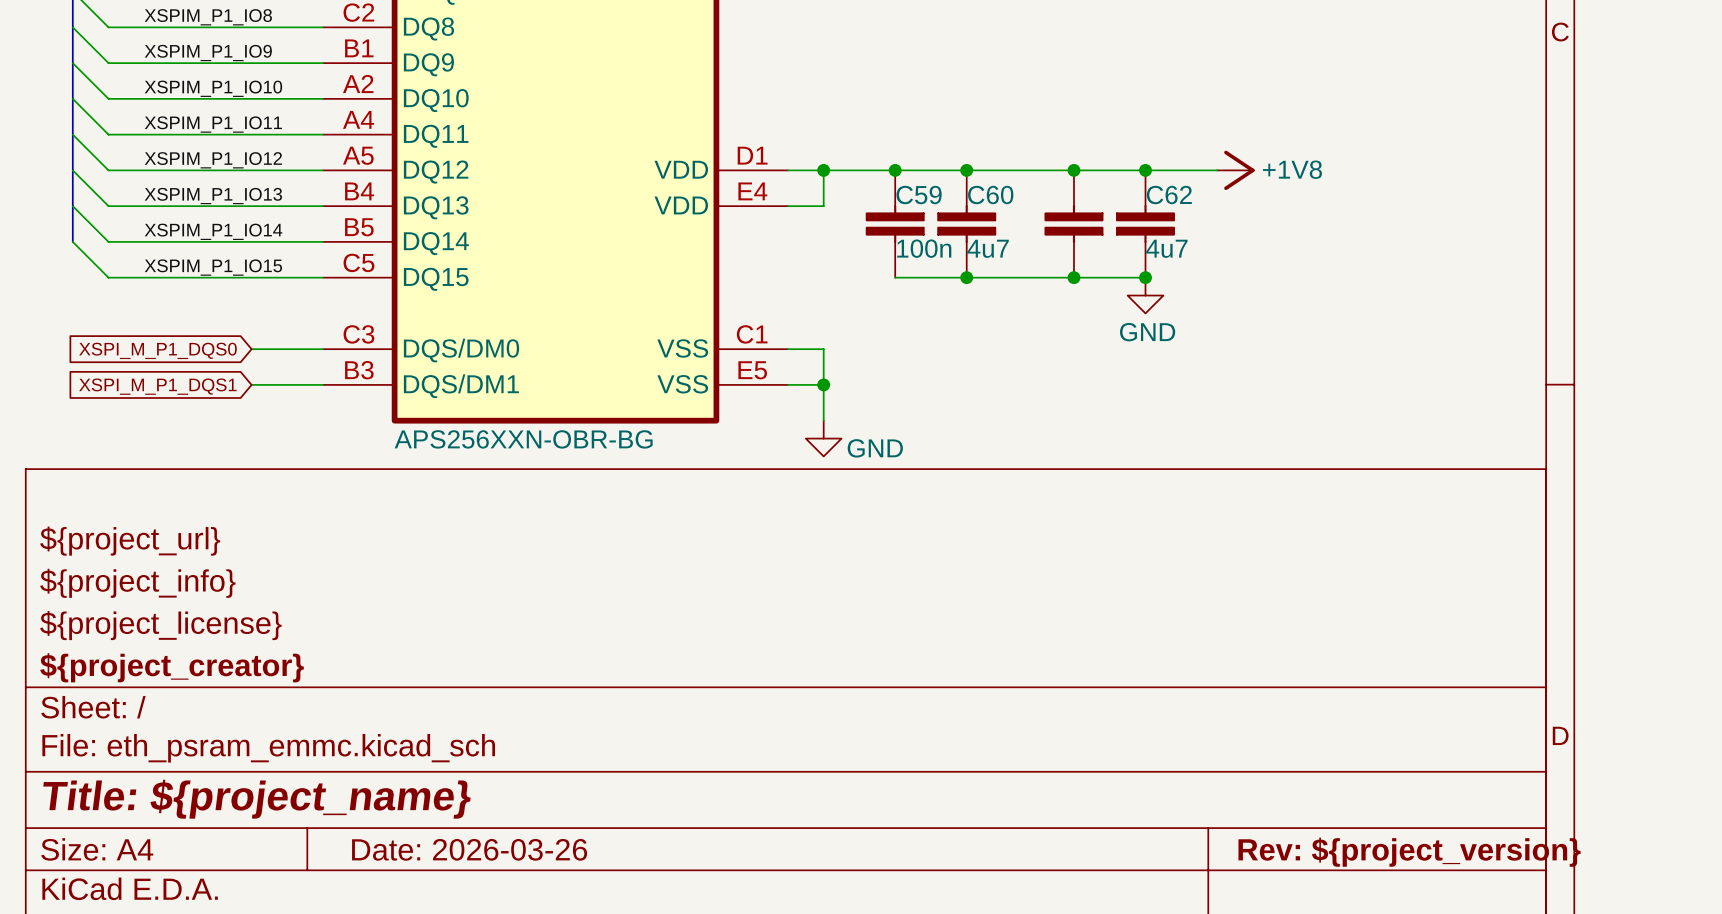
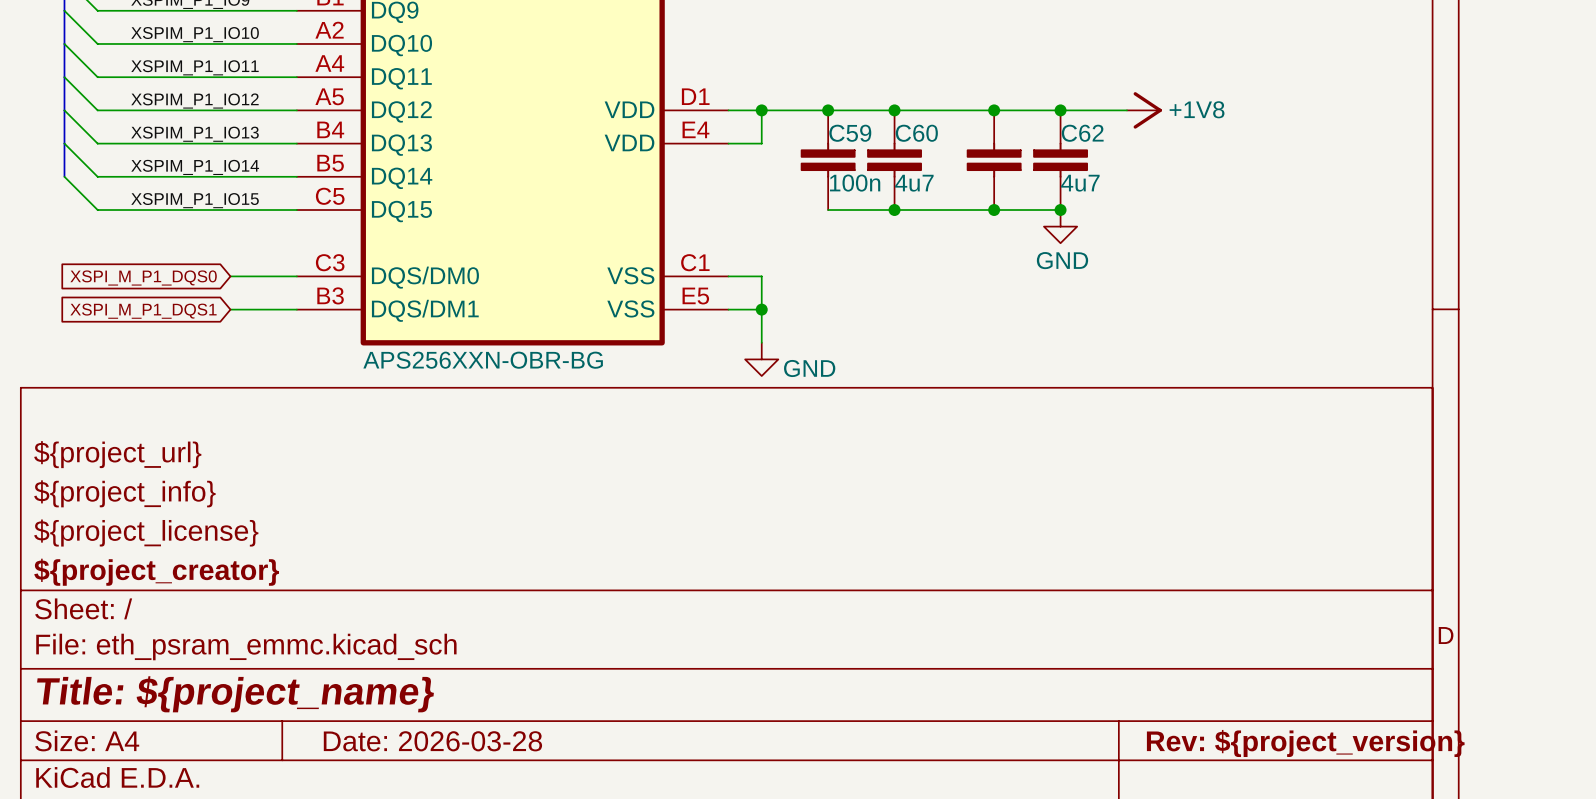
title block: Date: 2026-03-26 (469, 849) -> Date: 2026-03-28 (432, 741)

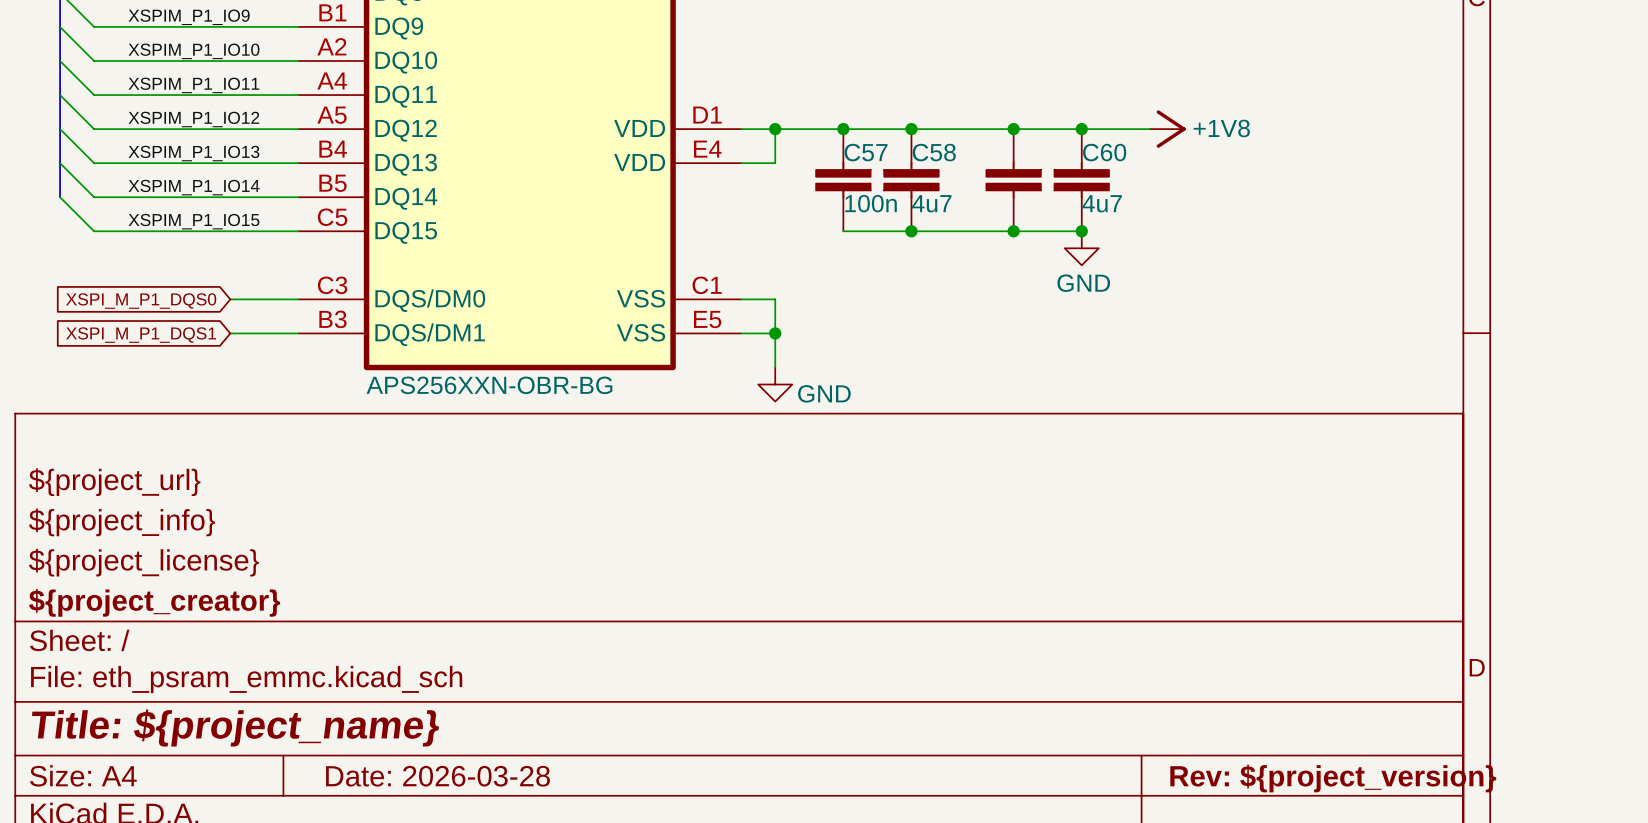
C59 name: C59 (850, 133) -> C57 (866, 152)
C60 name: C60 (916, 133) -> C58 (934, 152)
C62 name: C62 (1082, 133) -> C60 (1104, 152)

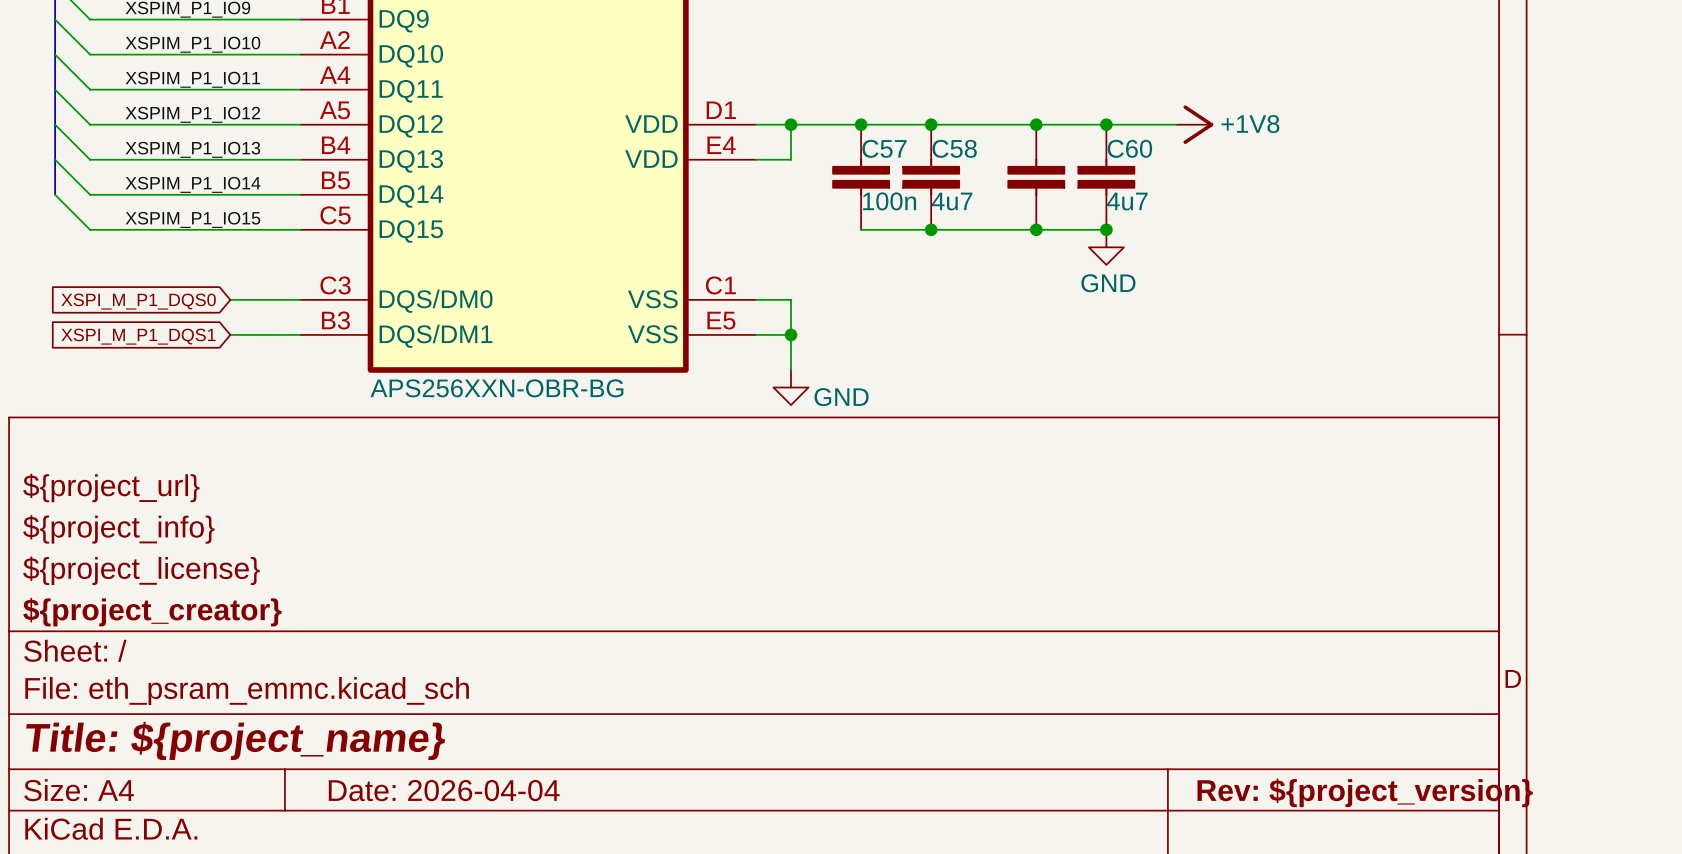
title block: Date: 2026-03-28 (437, 776) -> Date: 2026-04-04 (444, 790)

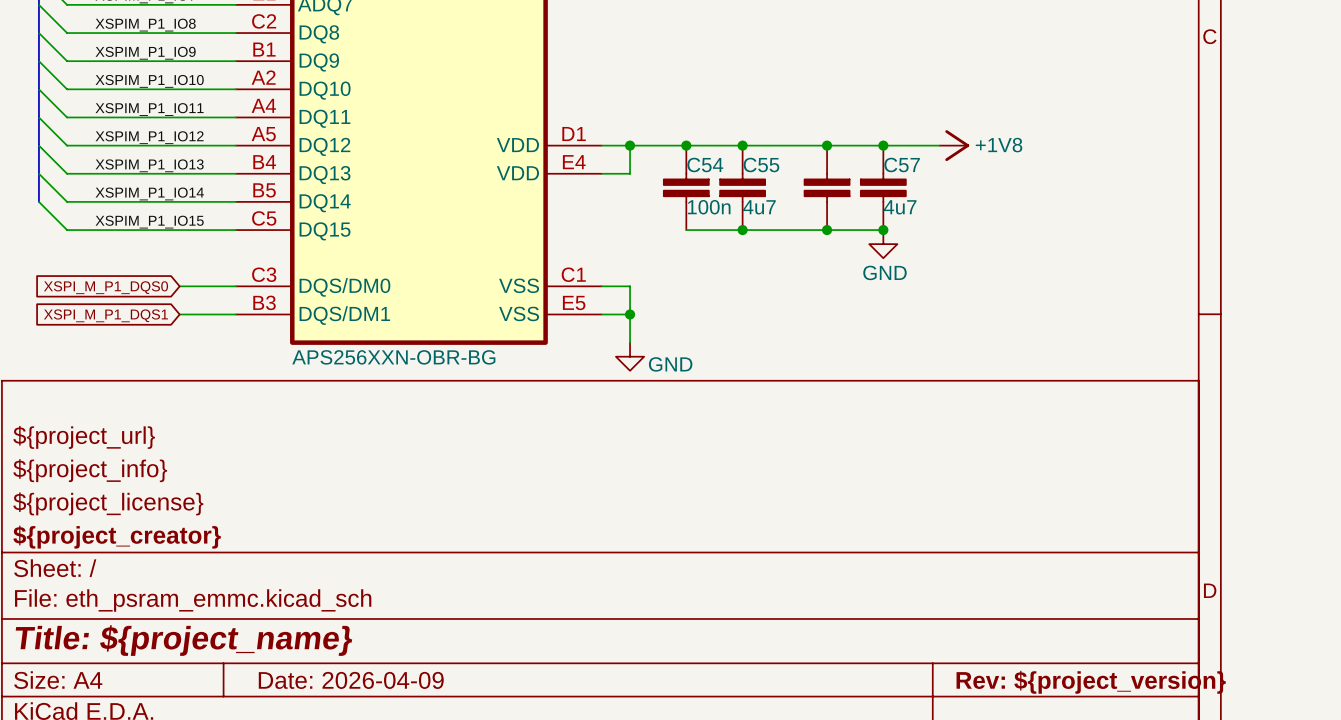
C57 name: C57 (884, 148) -> C54 (705, 164)
C58 name: C58 (954, 148) -> C55 (761, 164)
C60 name: C60 (1129, 148) -> C57 (902, 164)
title block: Date: 2026-04-04 (444, 790) -> Date: 2026-04-09 (351, 680)

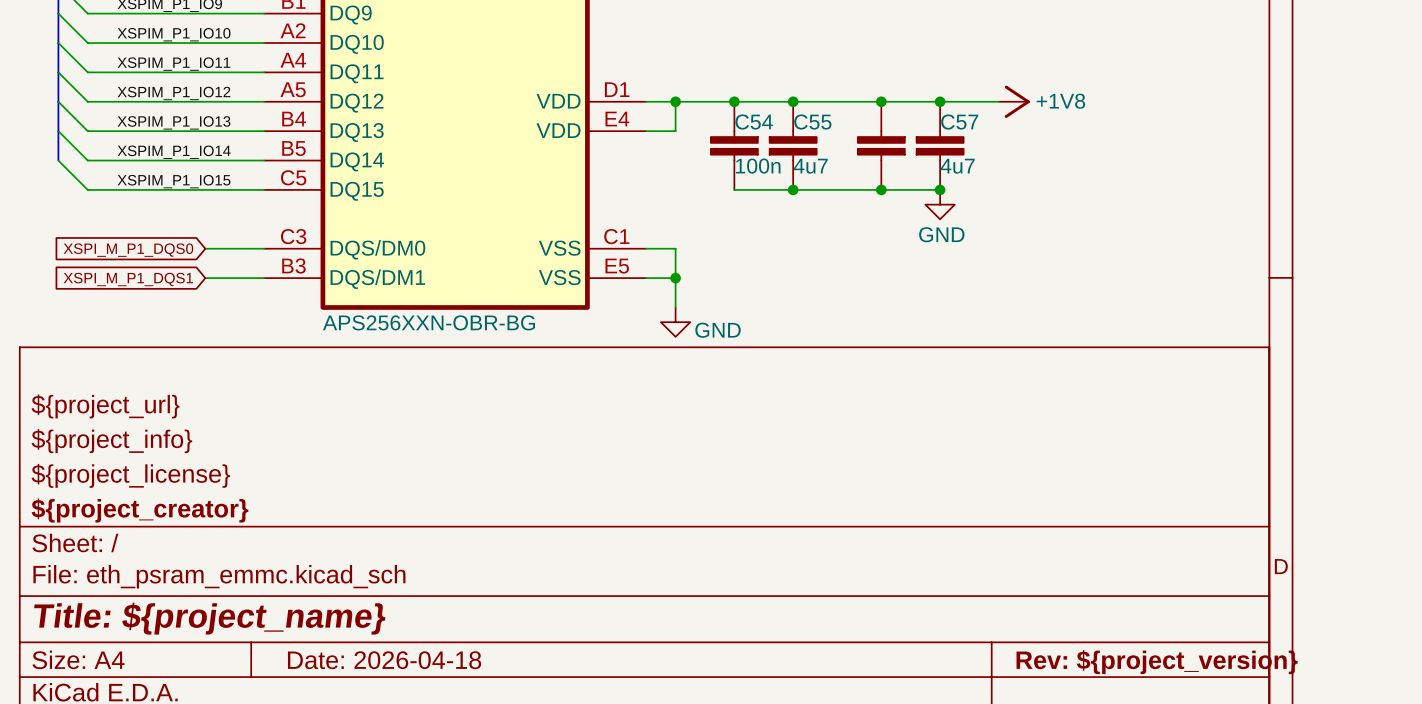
title block: Date: 2026-04-09 (351, 680) -> Date: 2026-04-18 (384, 660)

